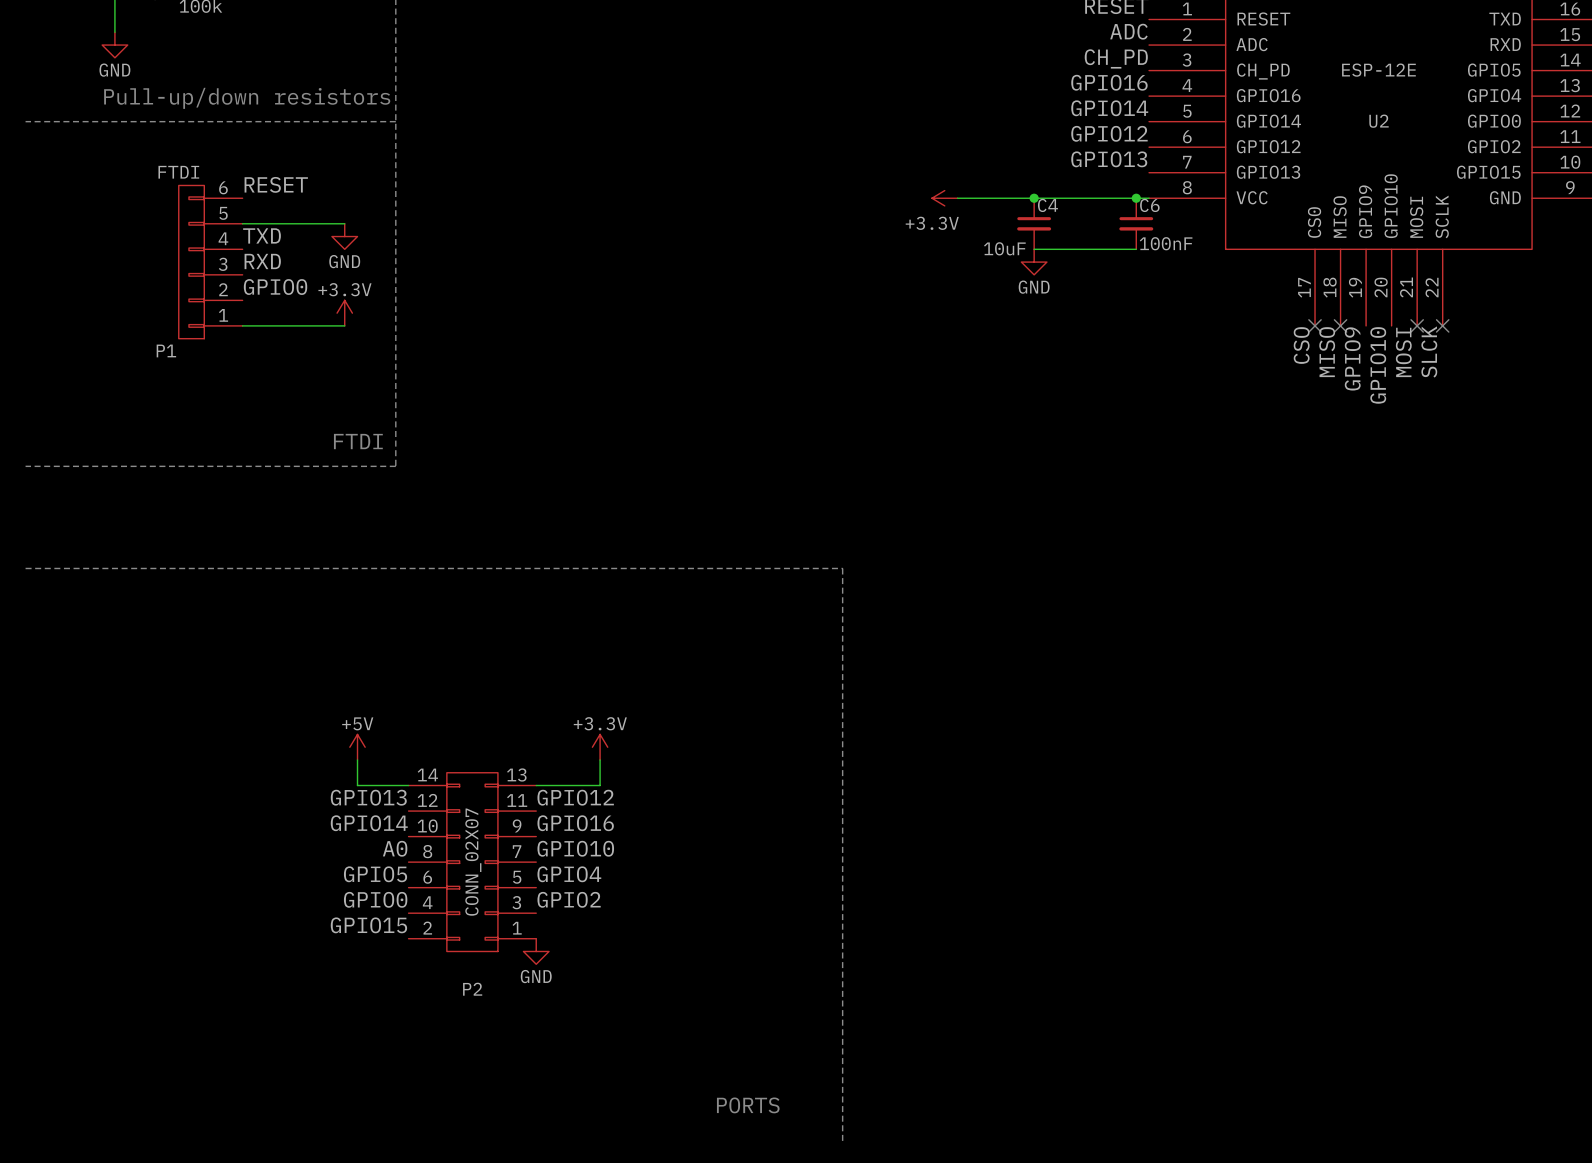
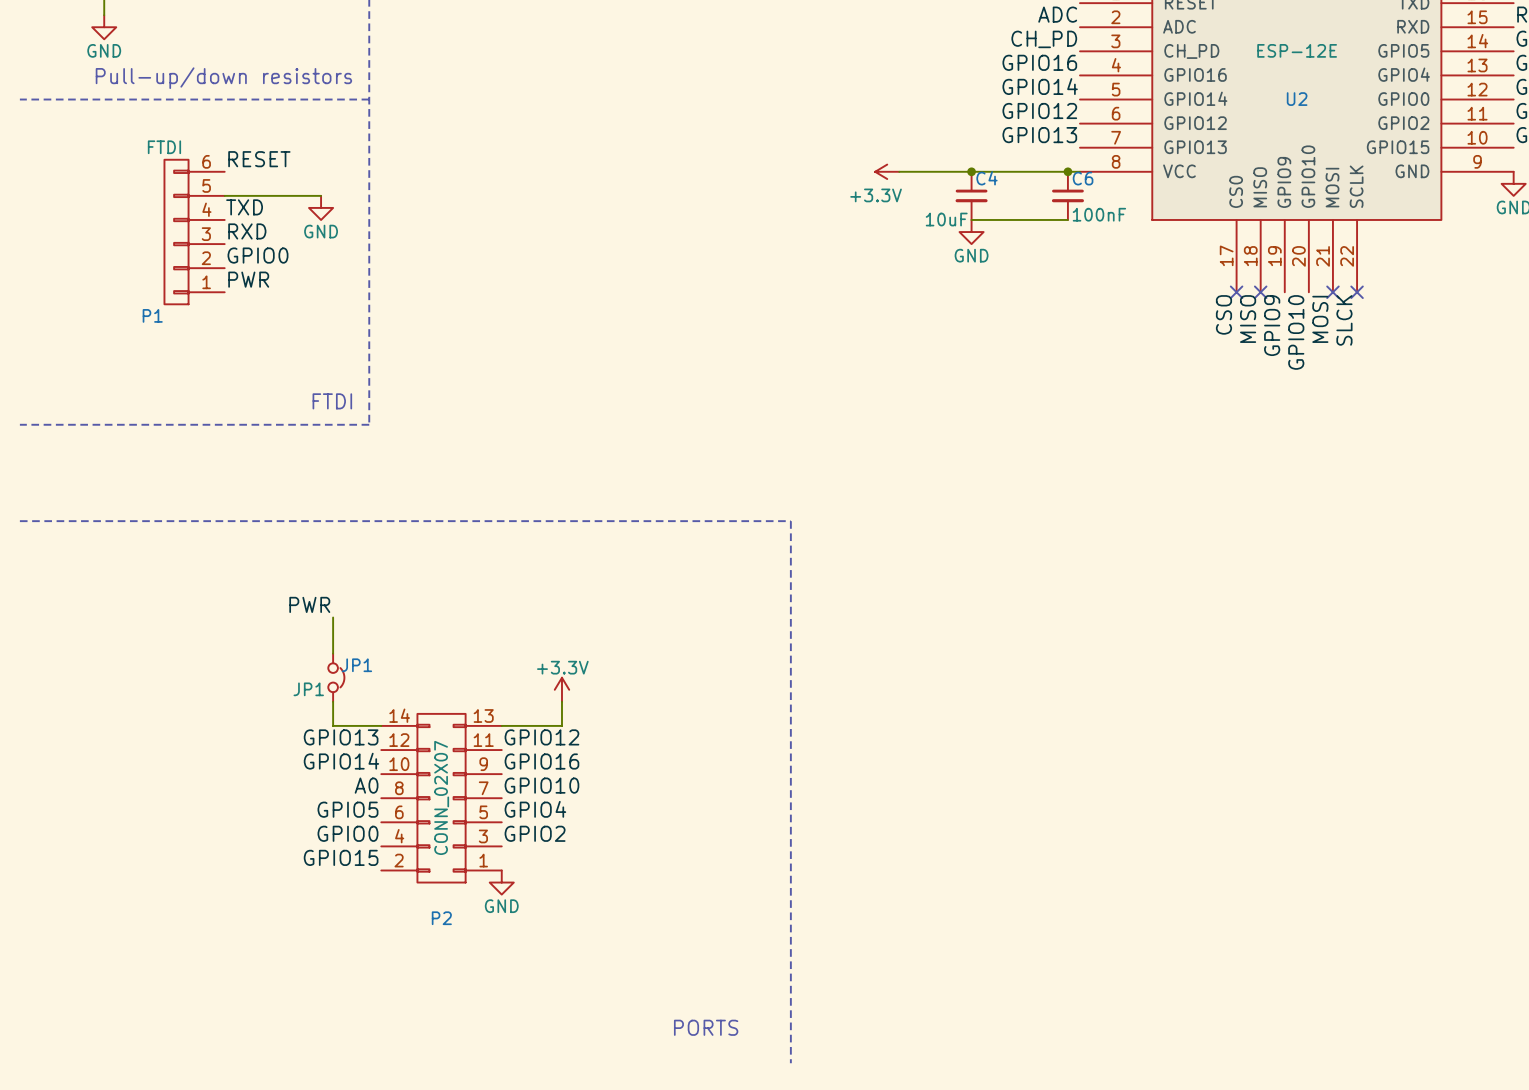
label: none -> PWR (248, 279)
power symbol: +3.3V (344, 313) -> none
wire: (242, 325) (344, 325) -> none
label: none -> PWR (309, 604)
wire: none -> (333, 617) (333, 653)
JP1: none -> JP1 (336, 677)
power symbol: +5V (357, 747) -> none

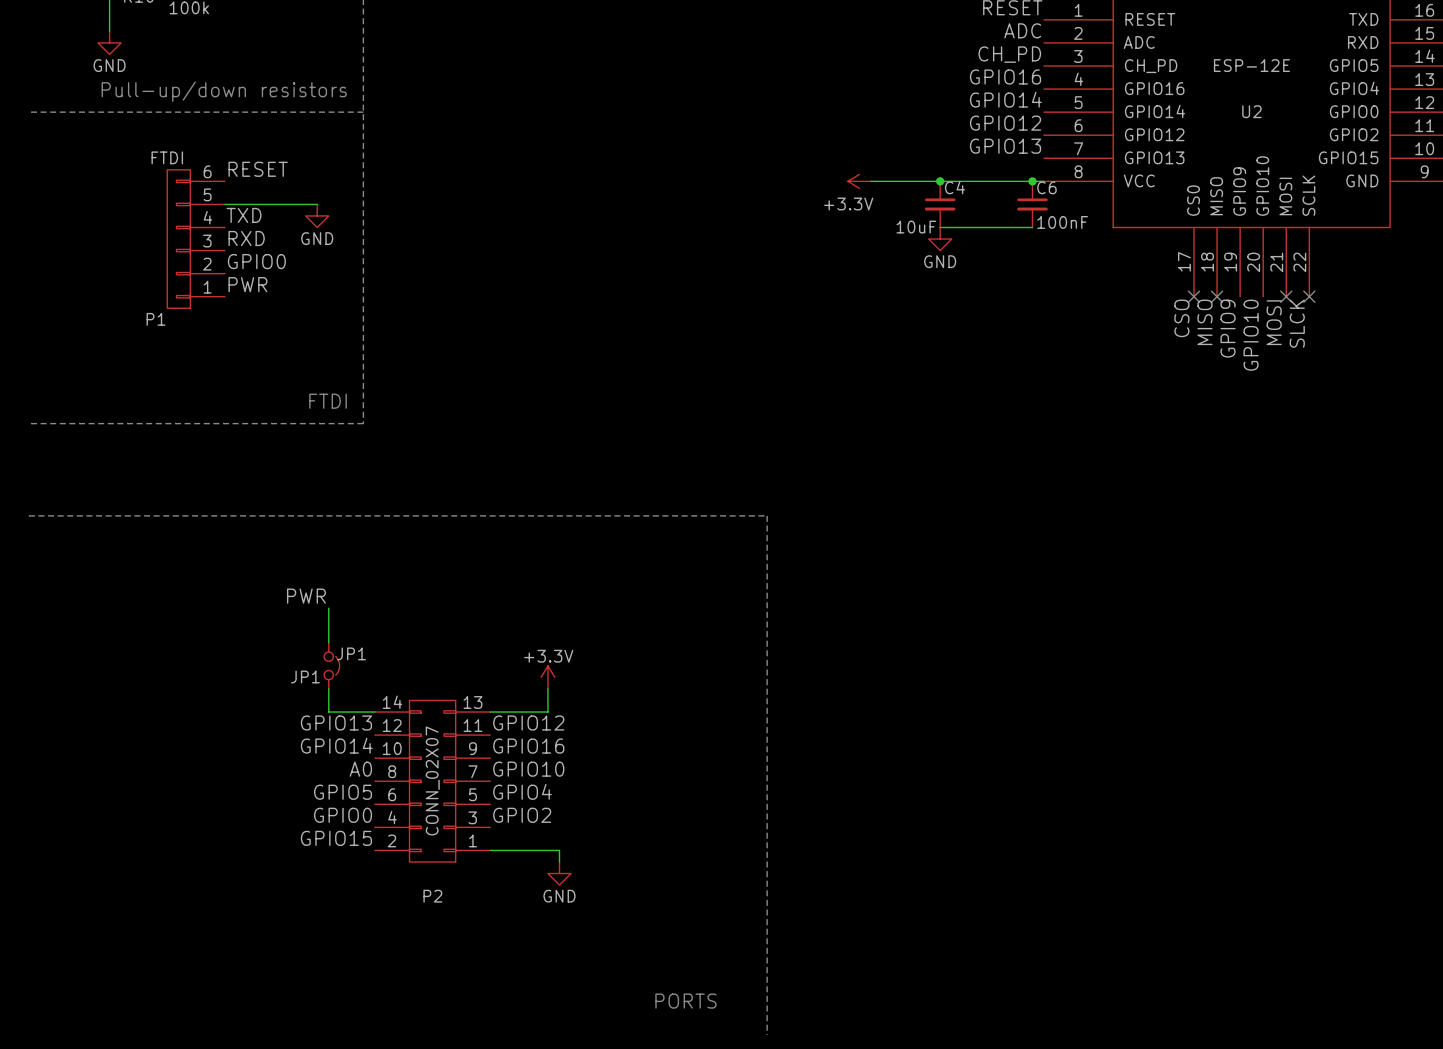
wire: none -> (490, 850) (559, 850) (559, 861)
power symbol position: GND (501, 882) -> GND (559, 873)

